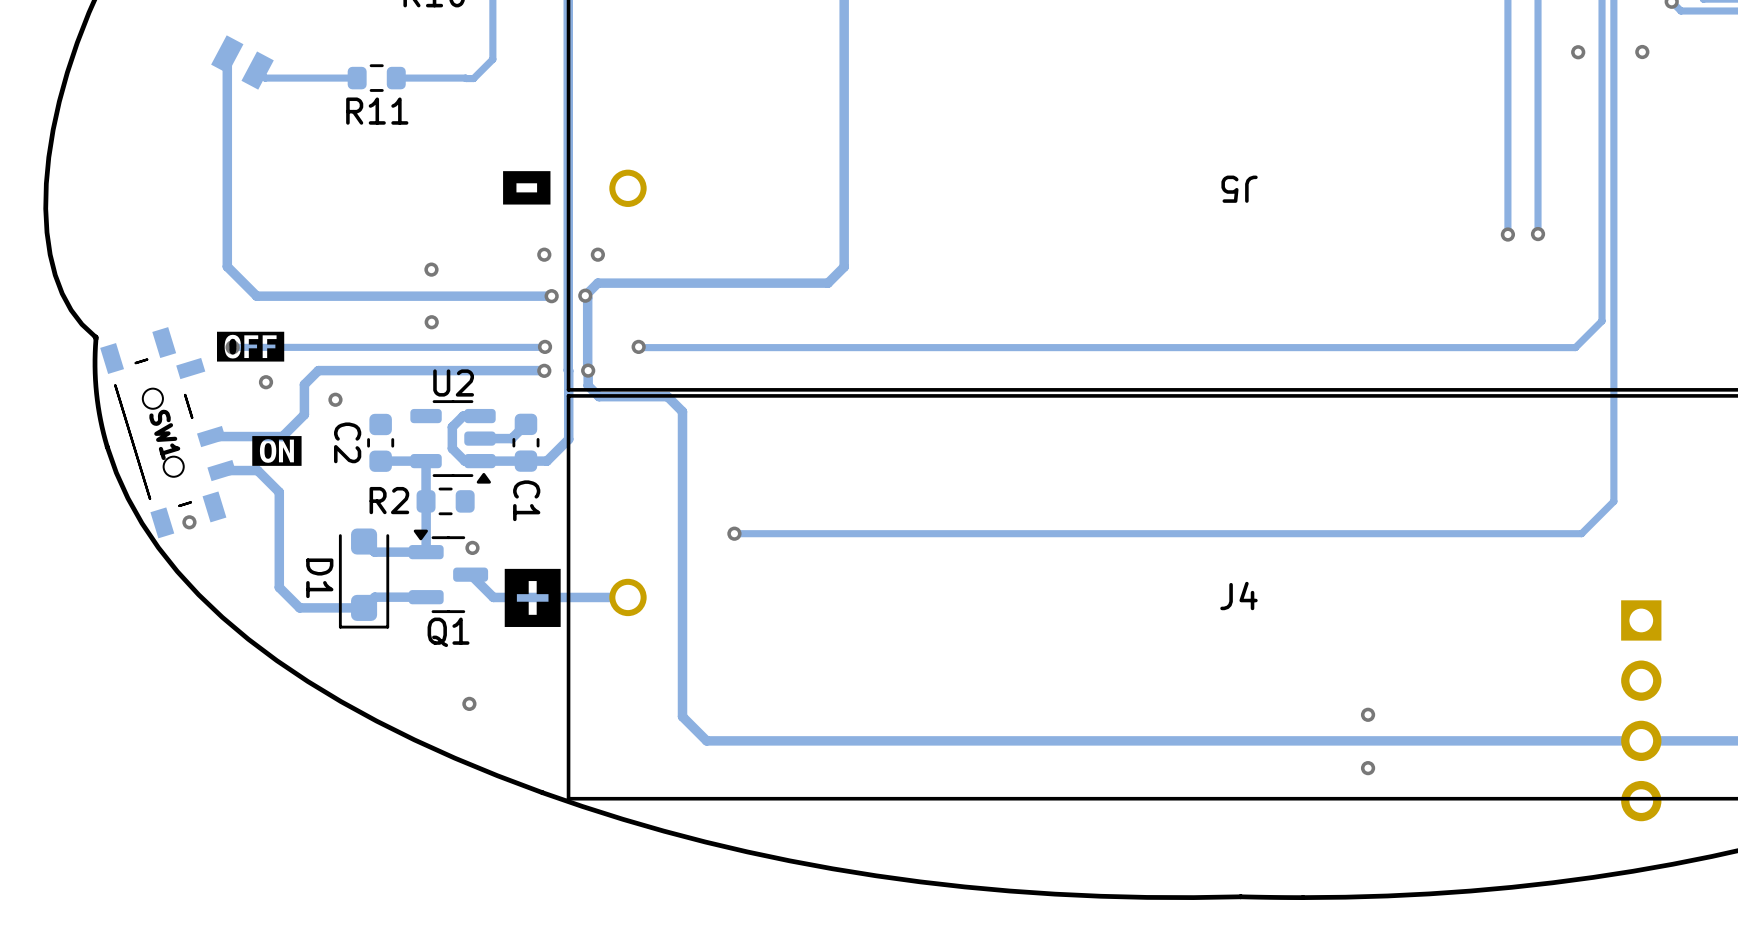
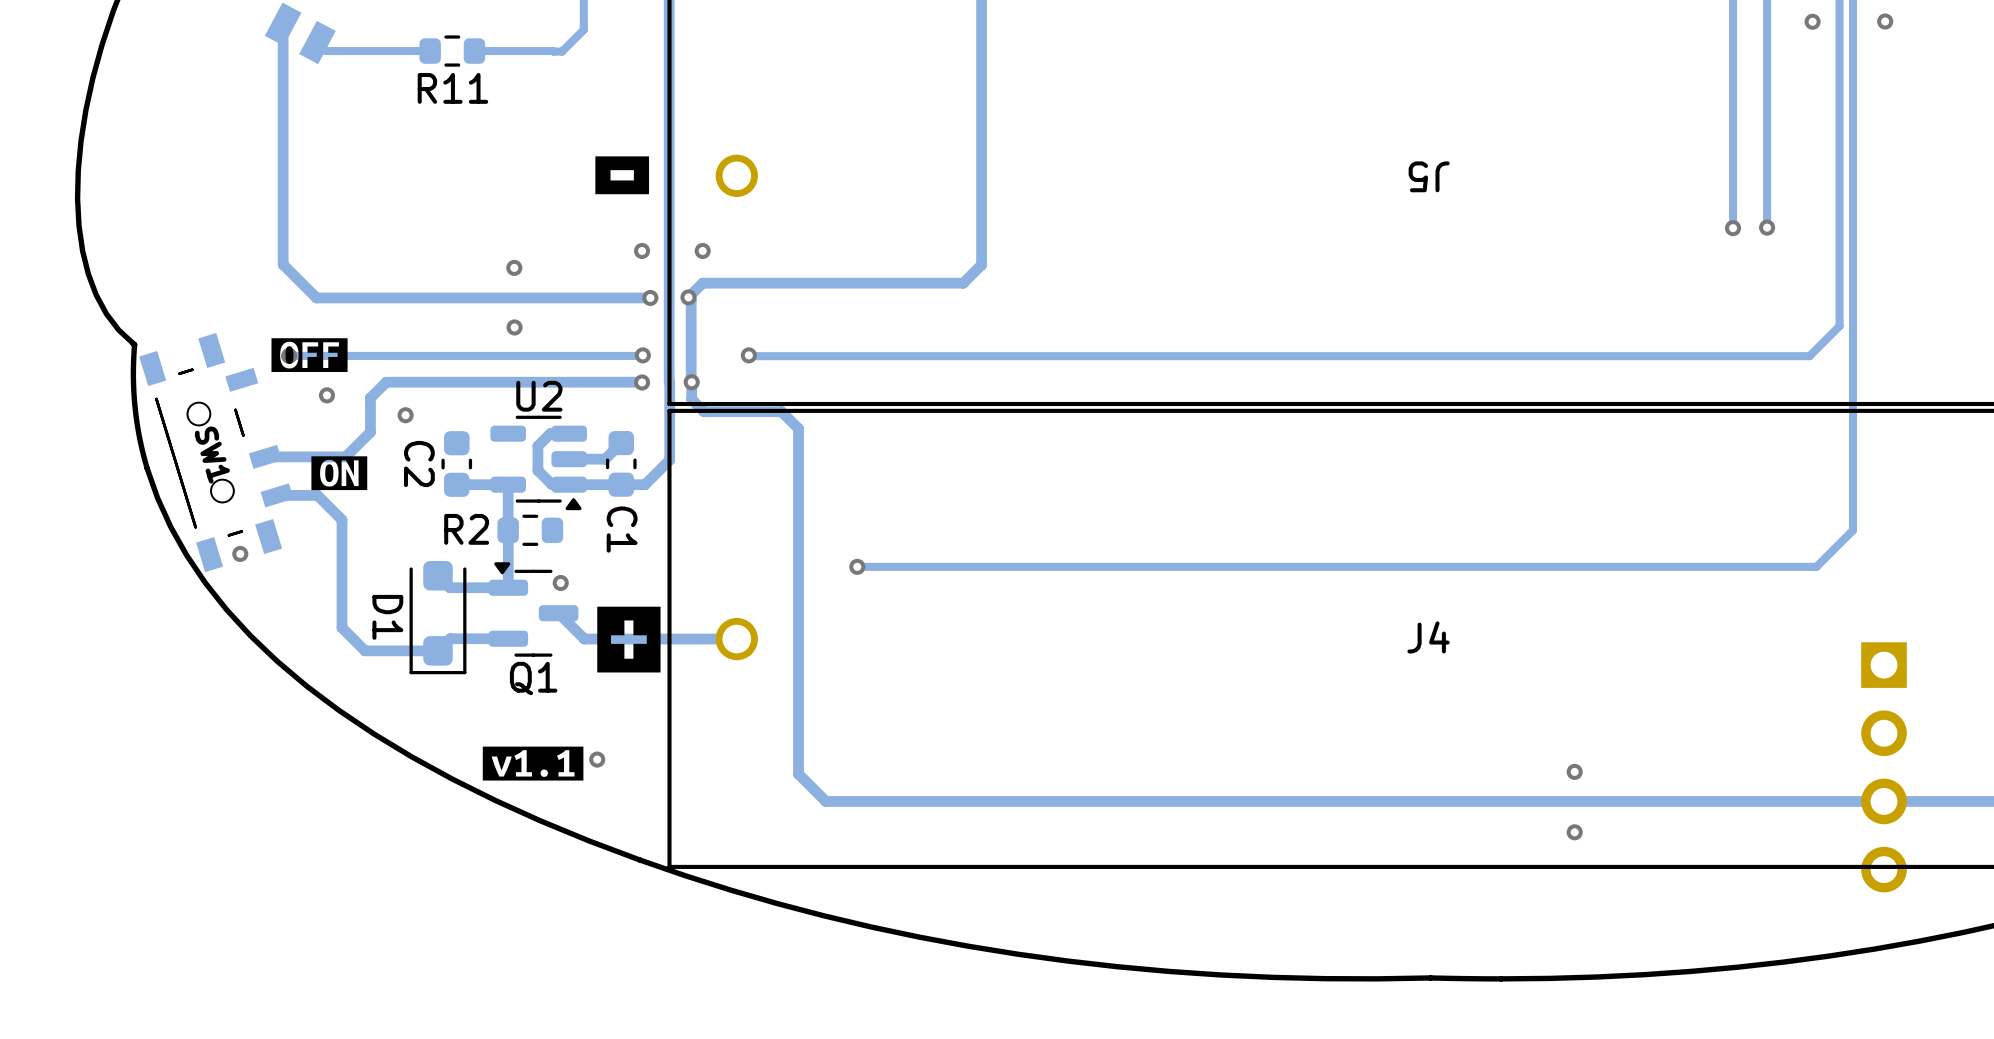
drawing: none -> [482, 746, 584, 781]
via position: (469, 703) -> (597, 759)

